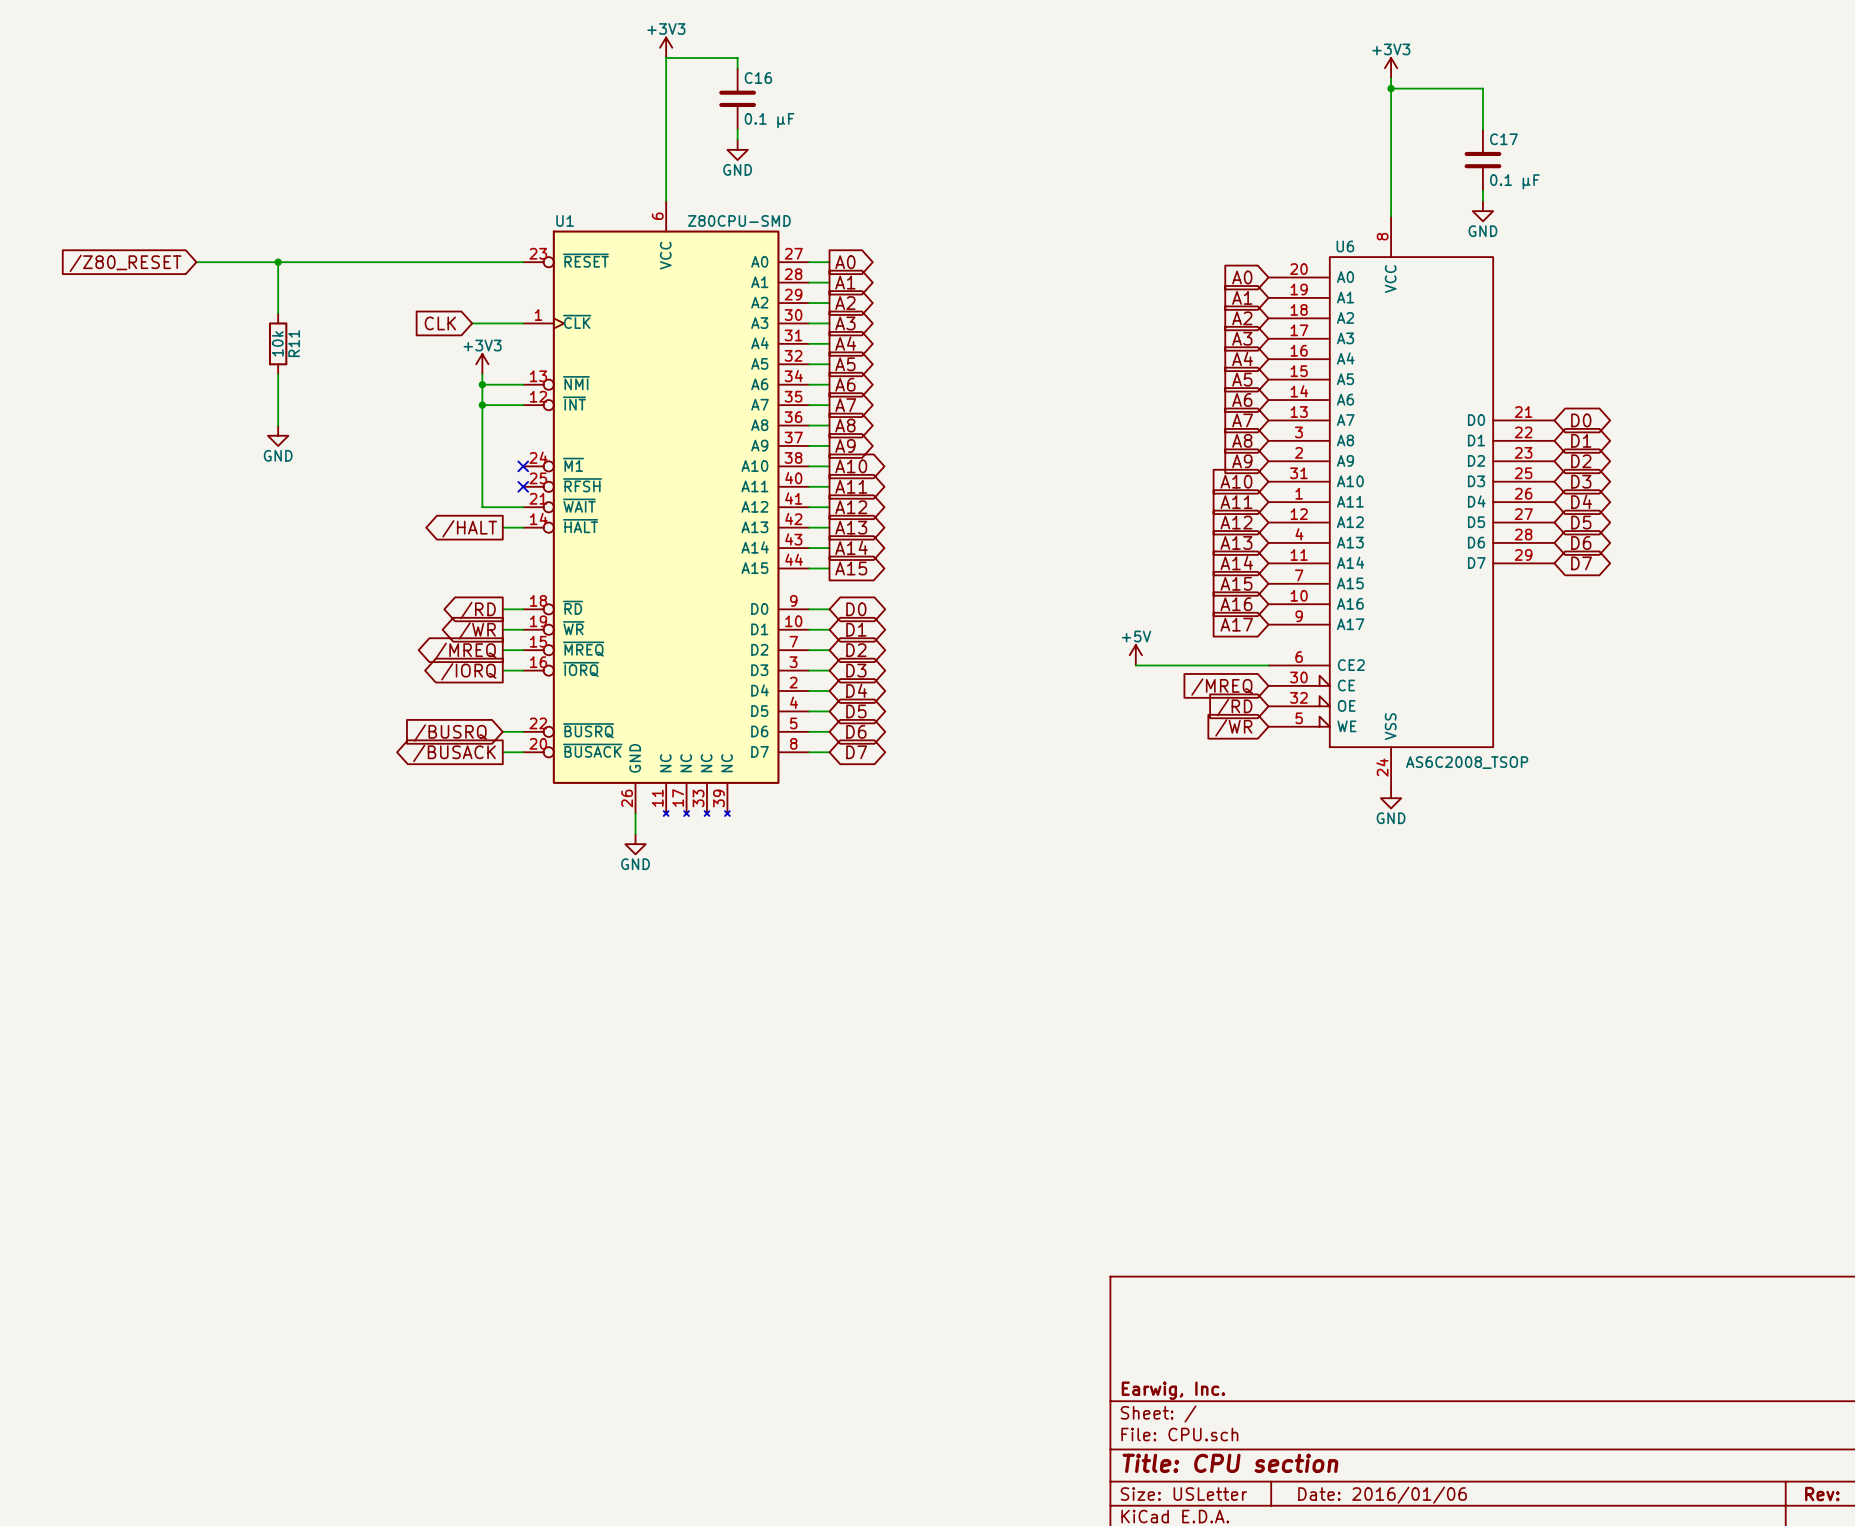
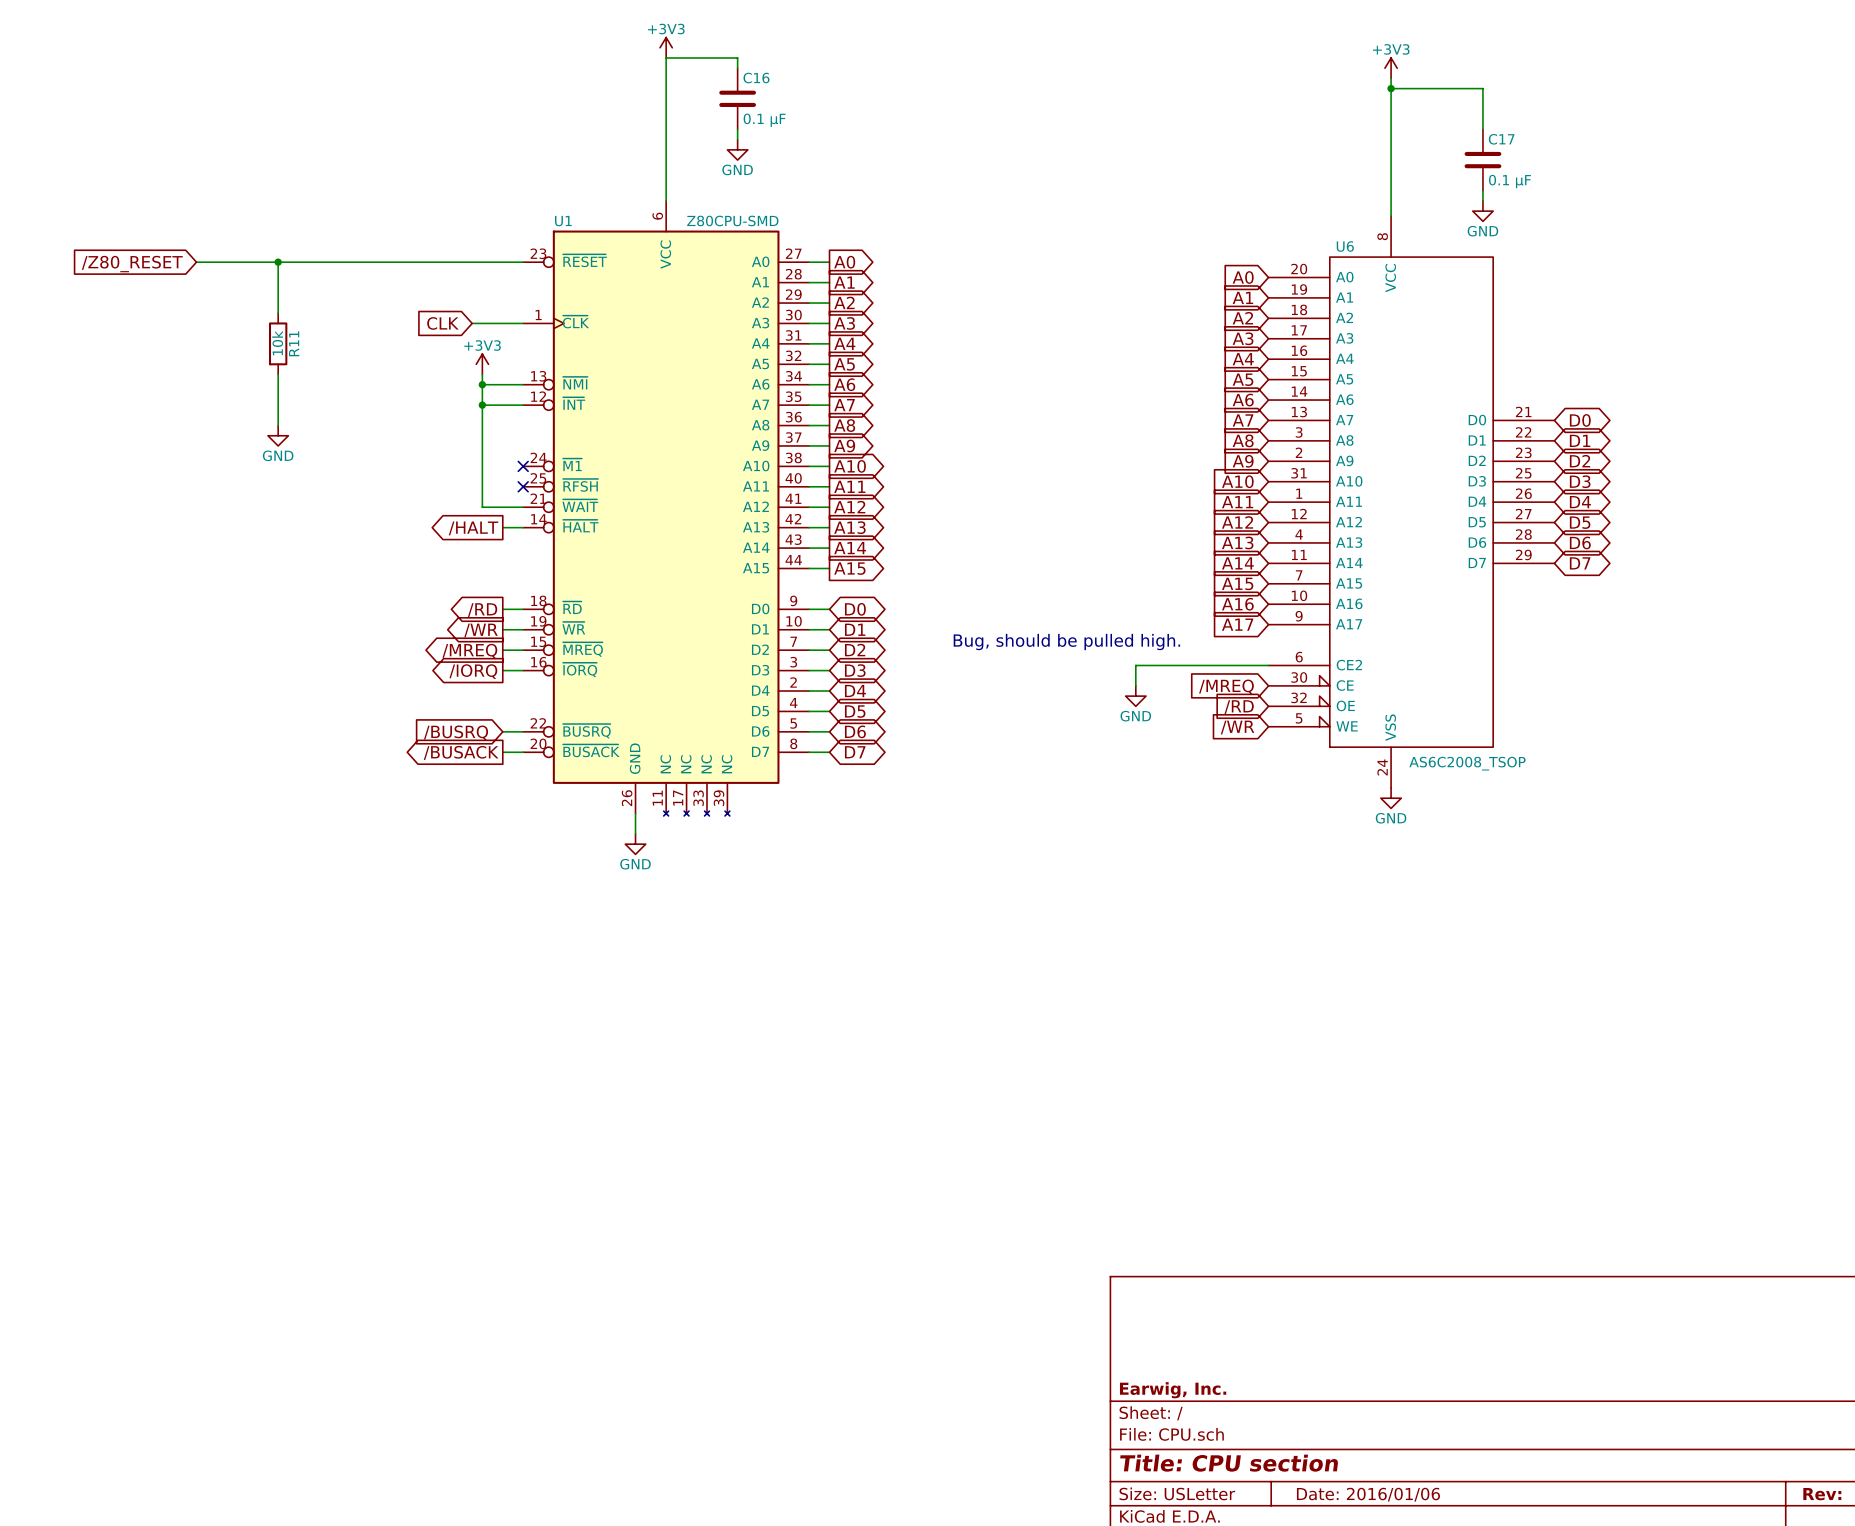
text: none -> Bug, should be pulled high. (1066, 642)
power symbol: +5V (1135, 655) -> none
wire: none -> (1135, 665) (1135, 685)
power symbol: none -> GND (1135, 696)

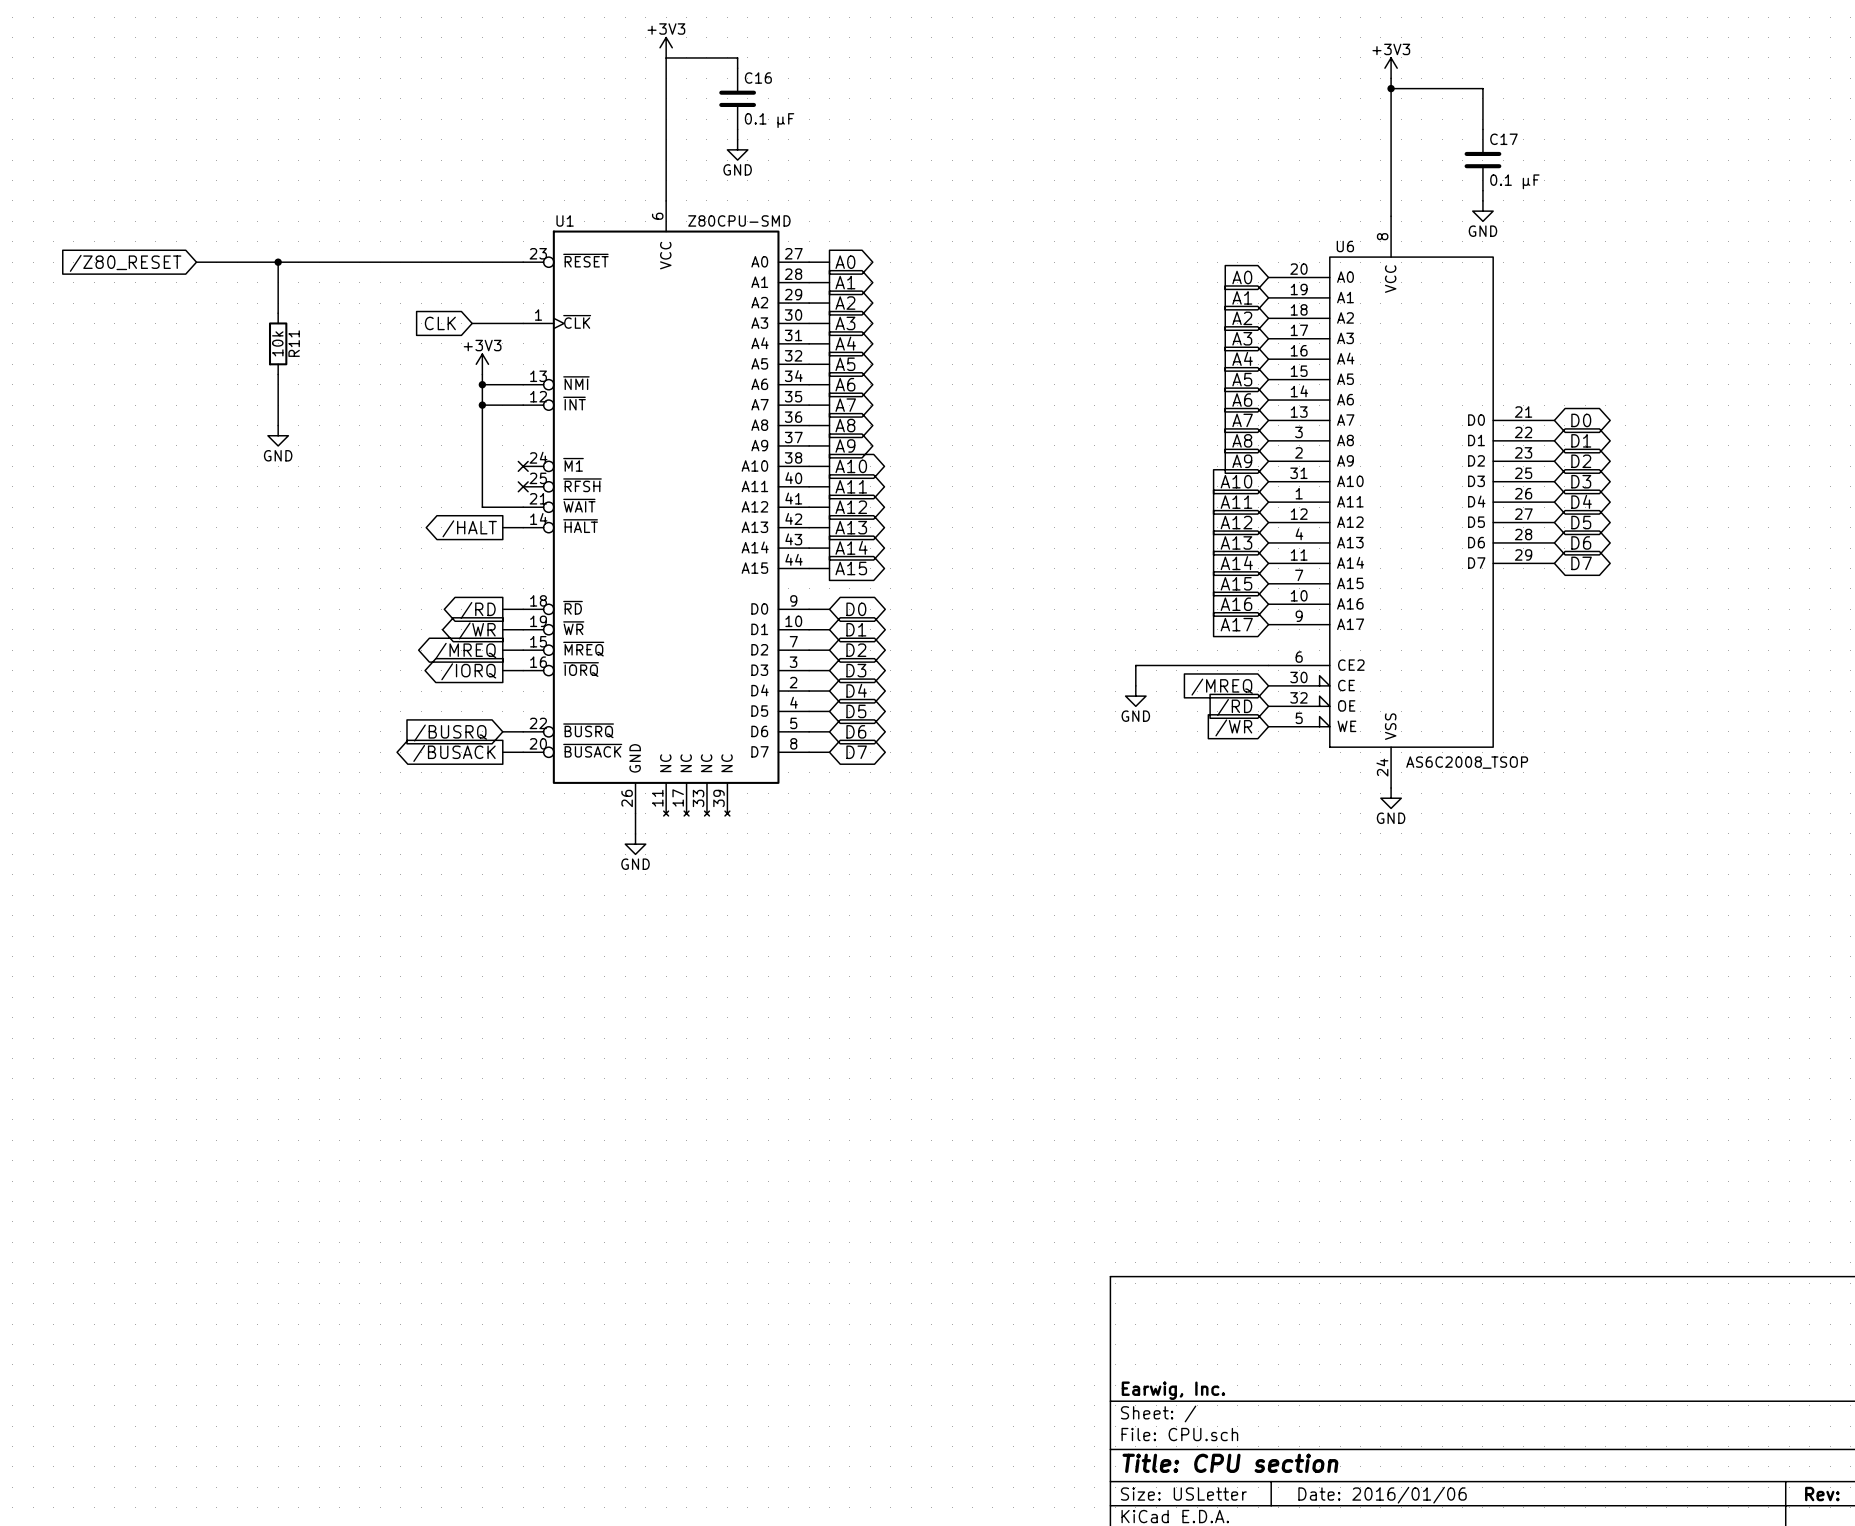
text: Bug, should be pulled high. (1066, 642) -> none

